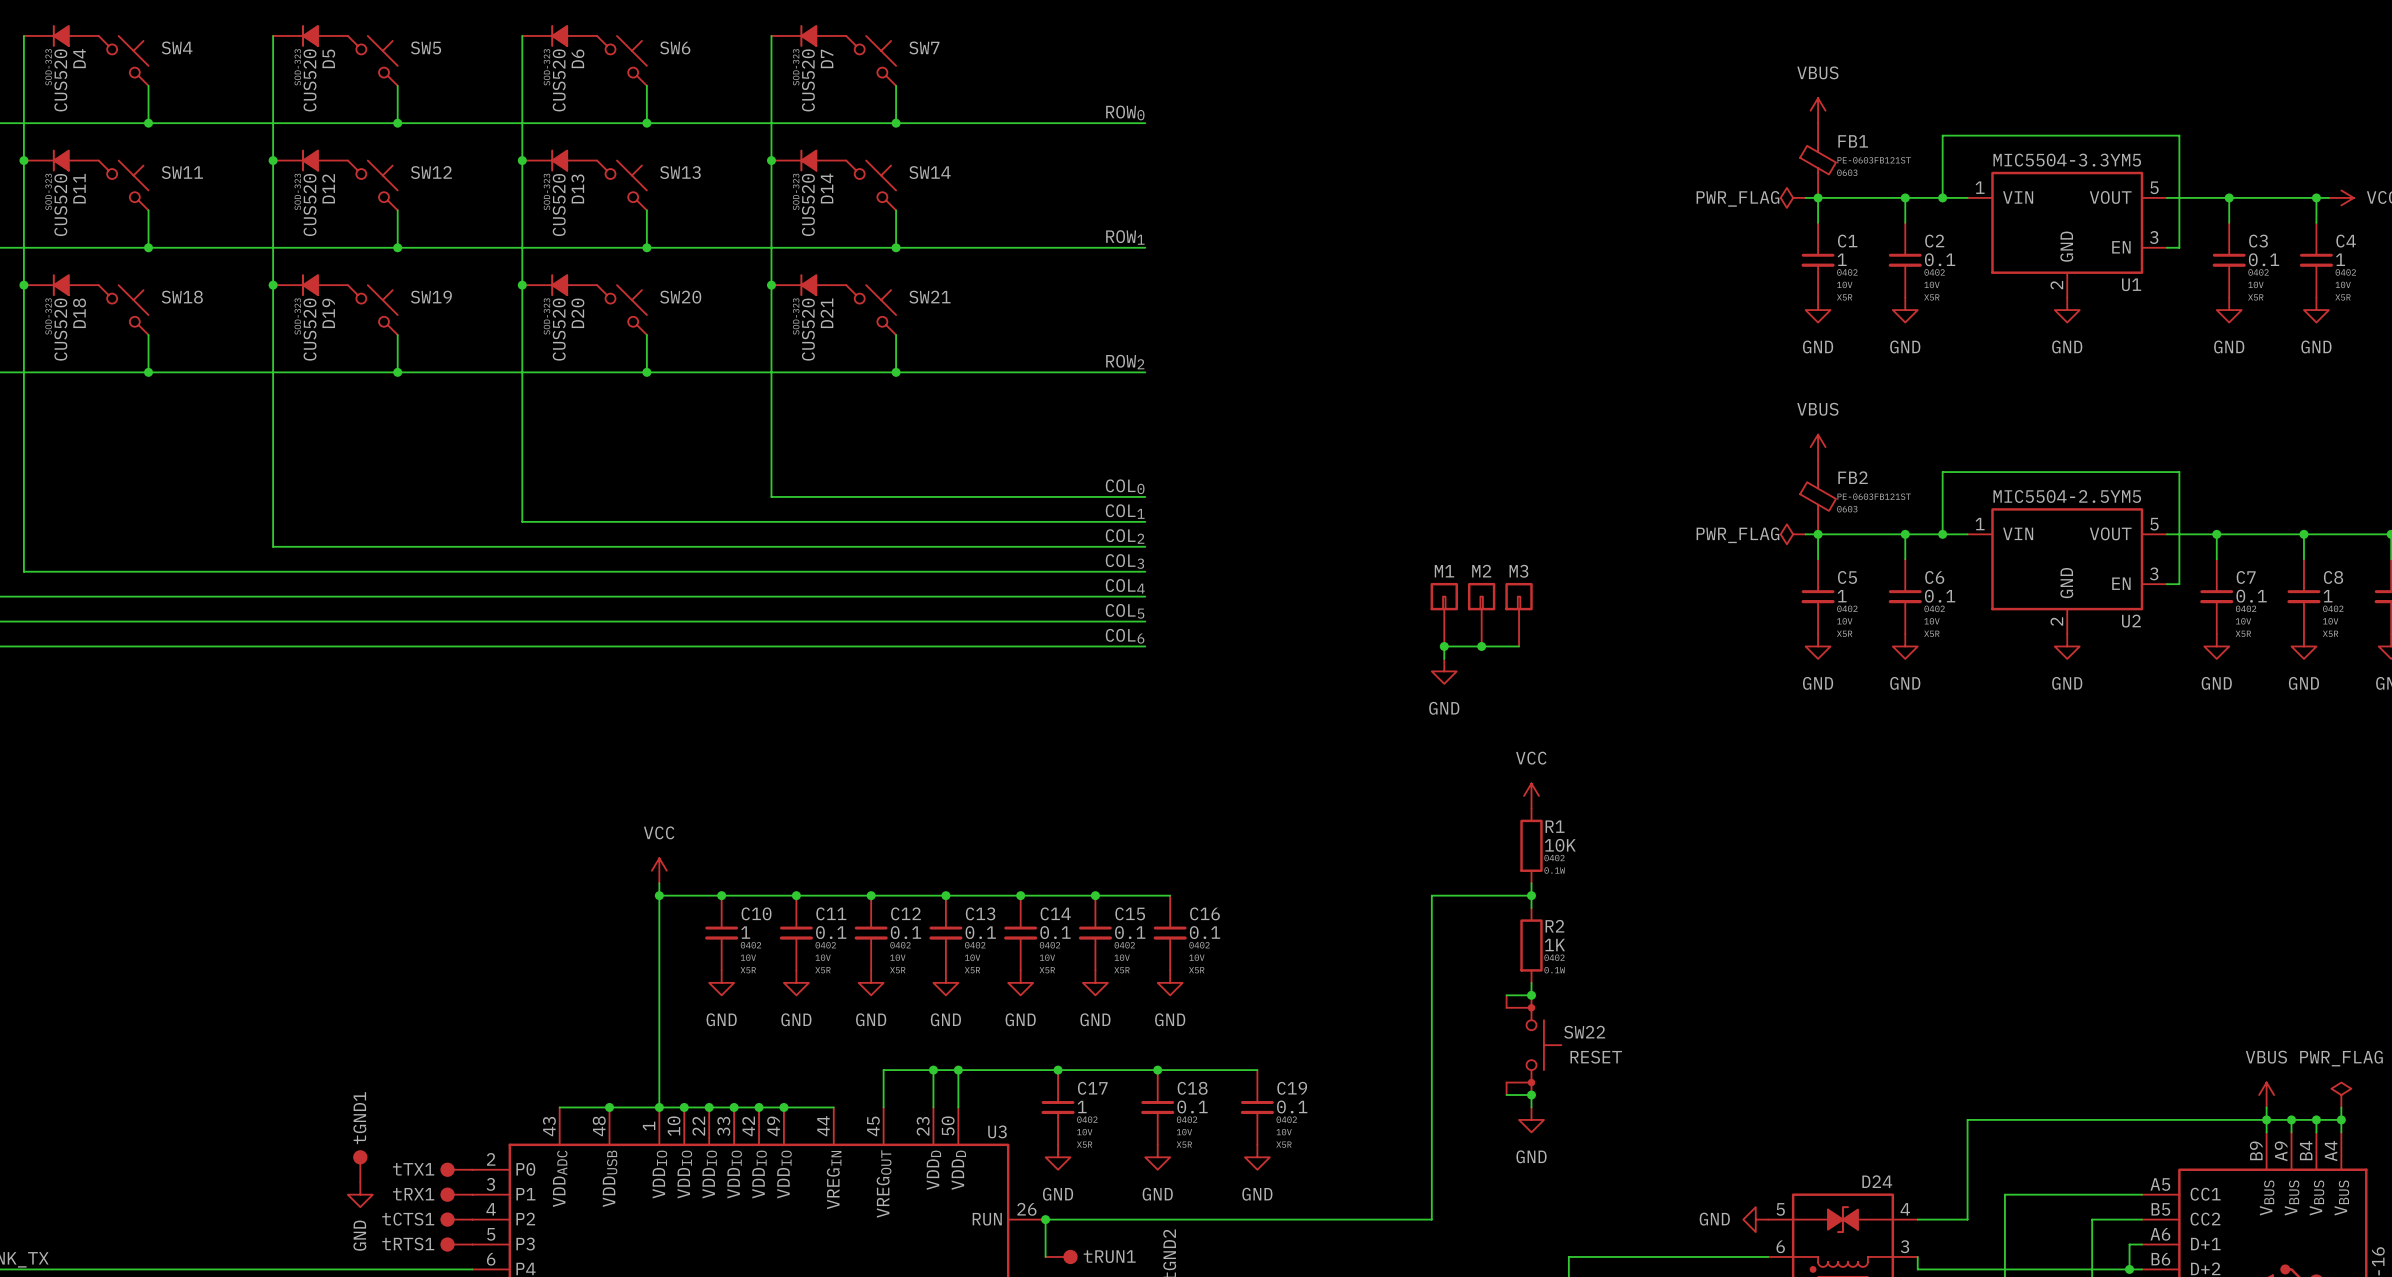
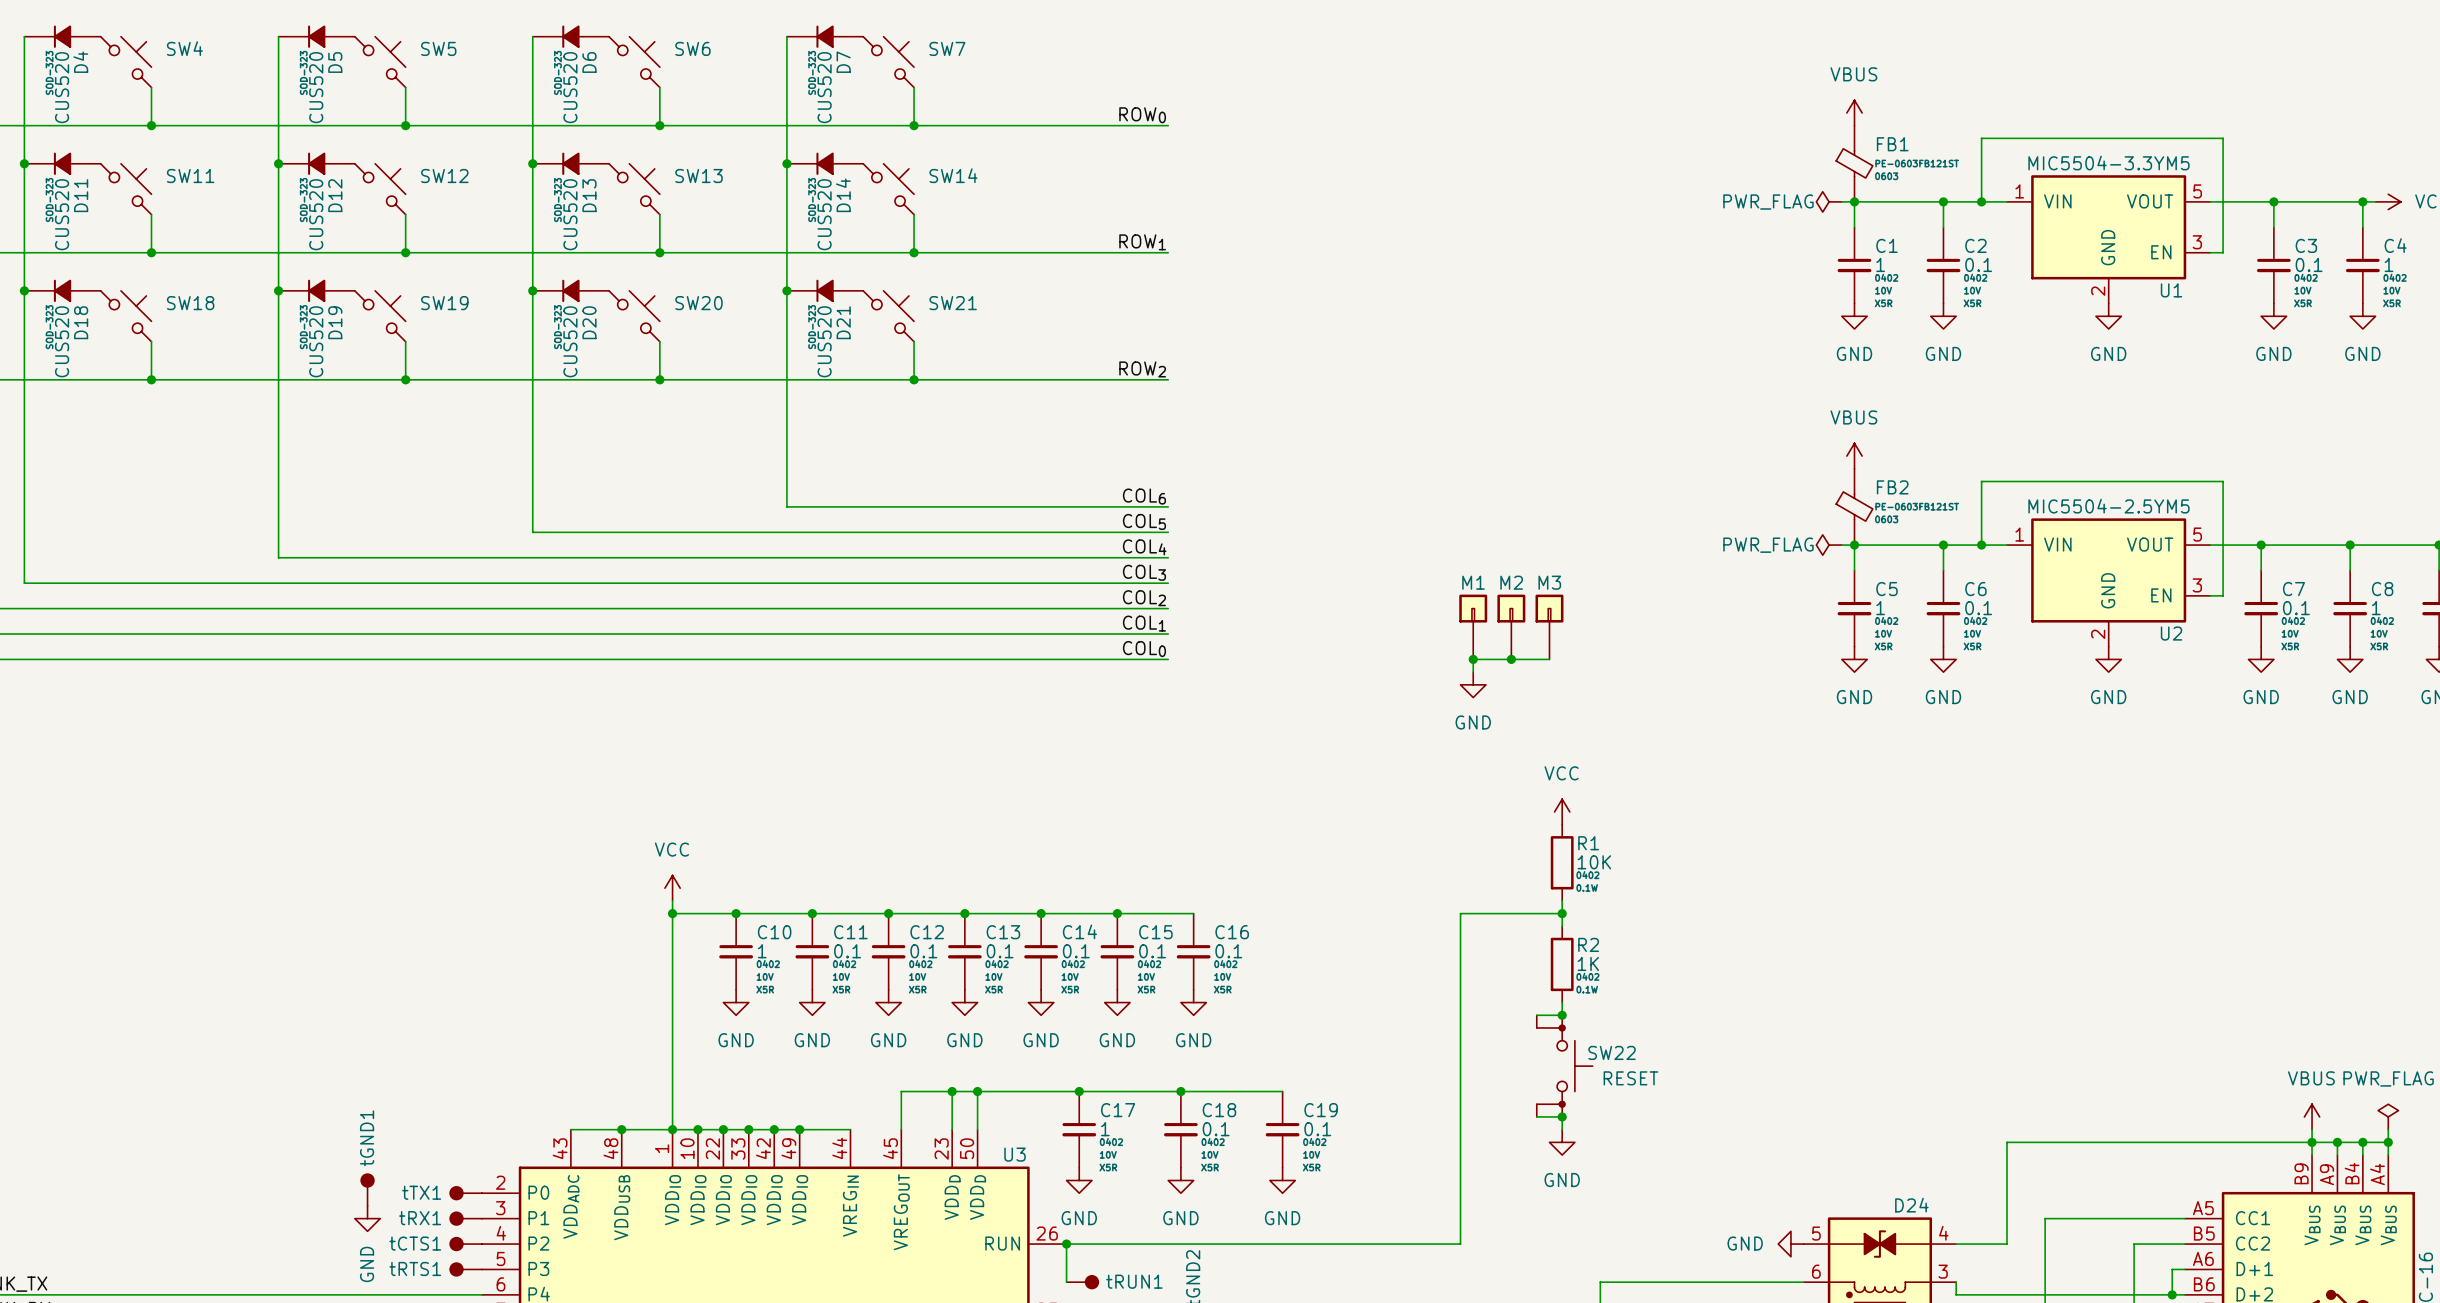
label: COL0 (1125, 486) -> COL6 (1144, 496)
label: COL1 (1125, 511) -> COL5 (1144, 521)
label: COL2 (1125, 536) -> COL4 (1144, 547)
label: COL4 (1125, 586) -> COL2 (1144, 598)
label: COL5 (1125, 611) -> COL1 (1144, 623)
label: COL6 (1125, 636) -> COL0 (1144, 649)

